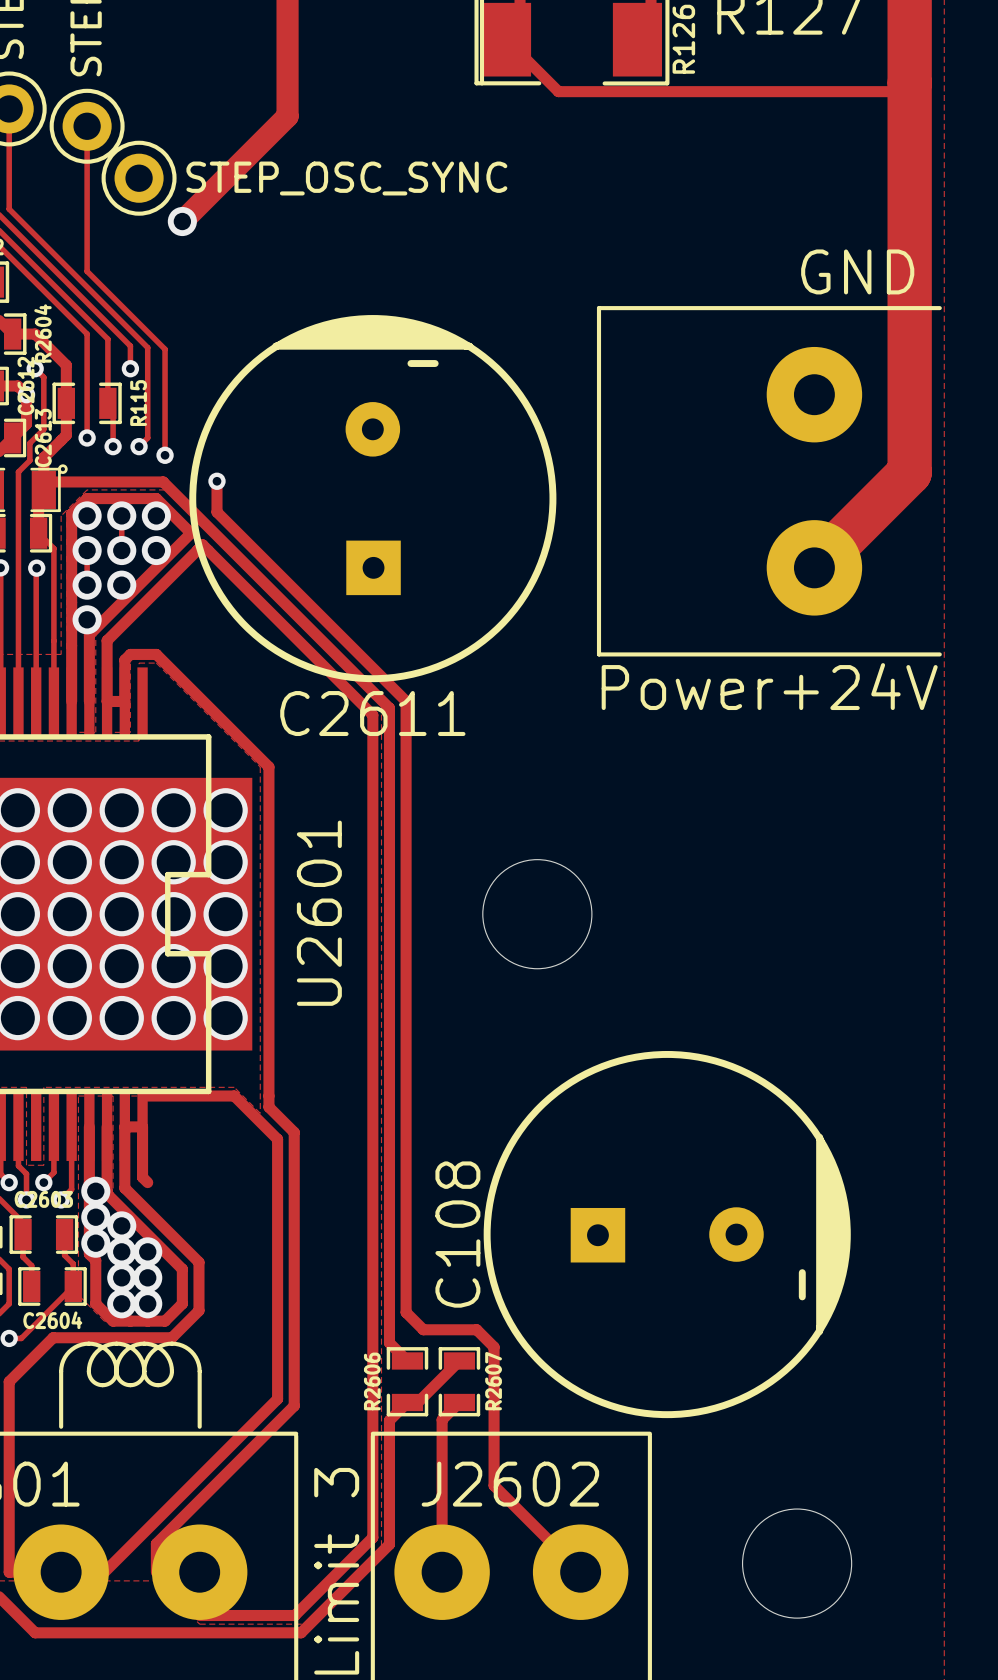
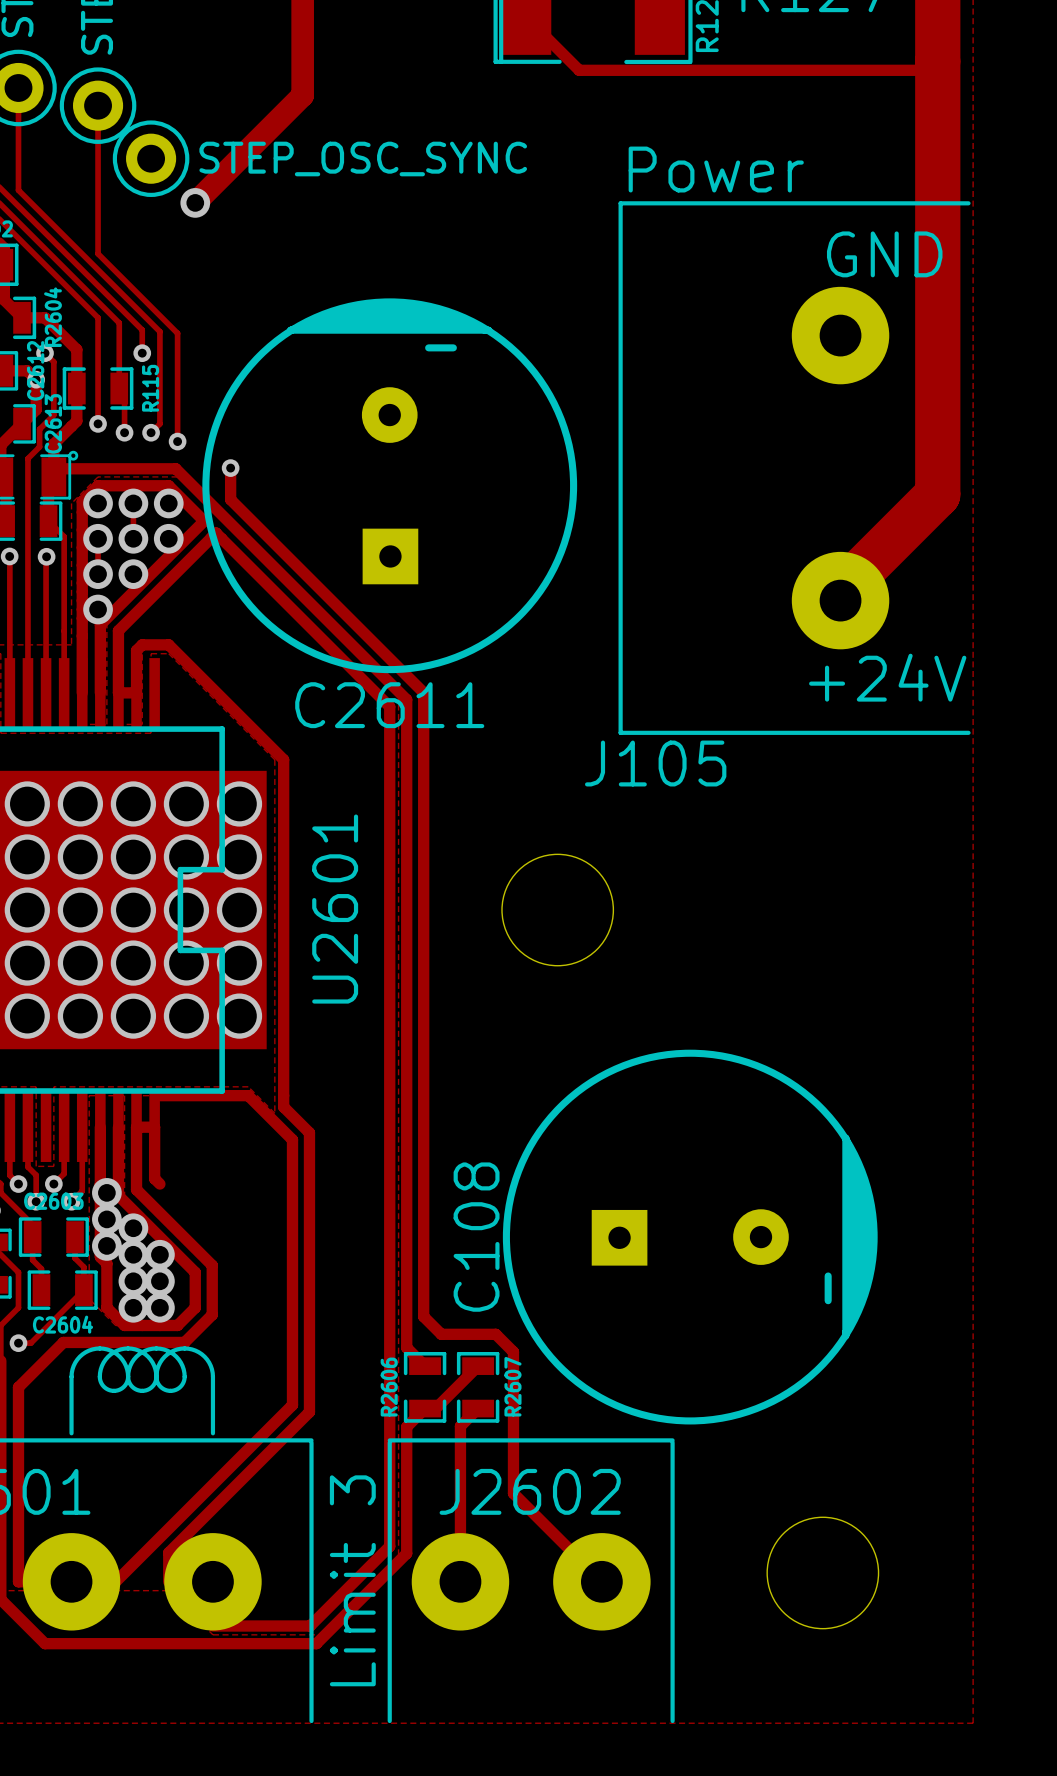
track: (909, 472) (814, 567) -> (937, 459) (937, 494) (840, 591)
part: Power (769, 481) -> none
J105: none -> Power (794, 468)

